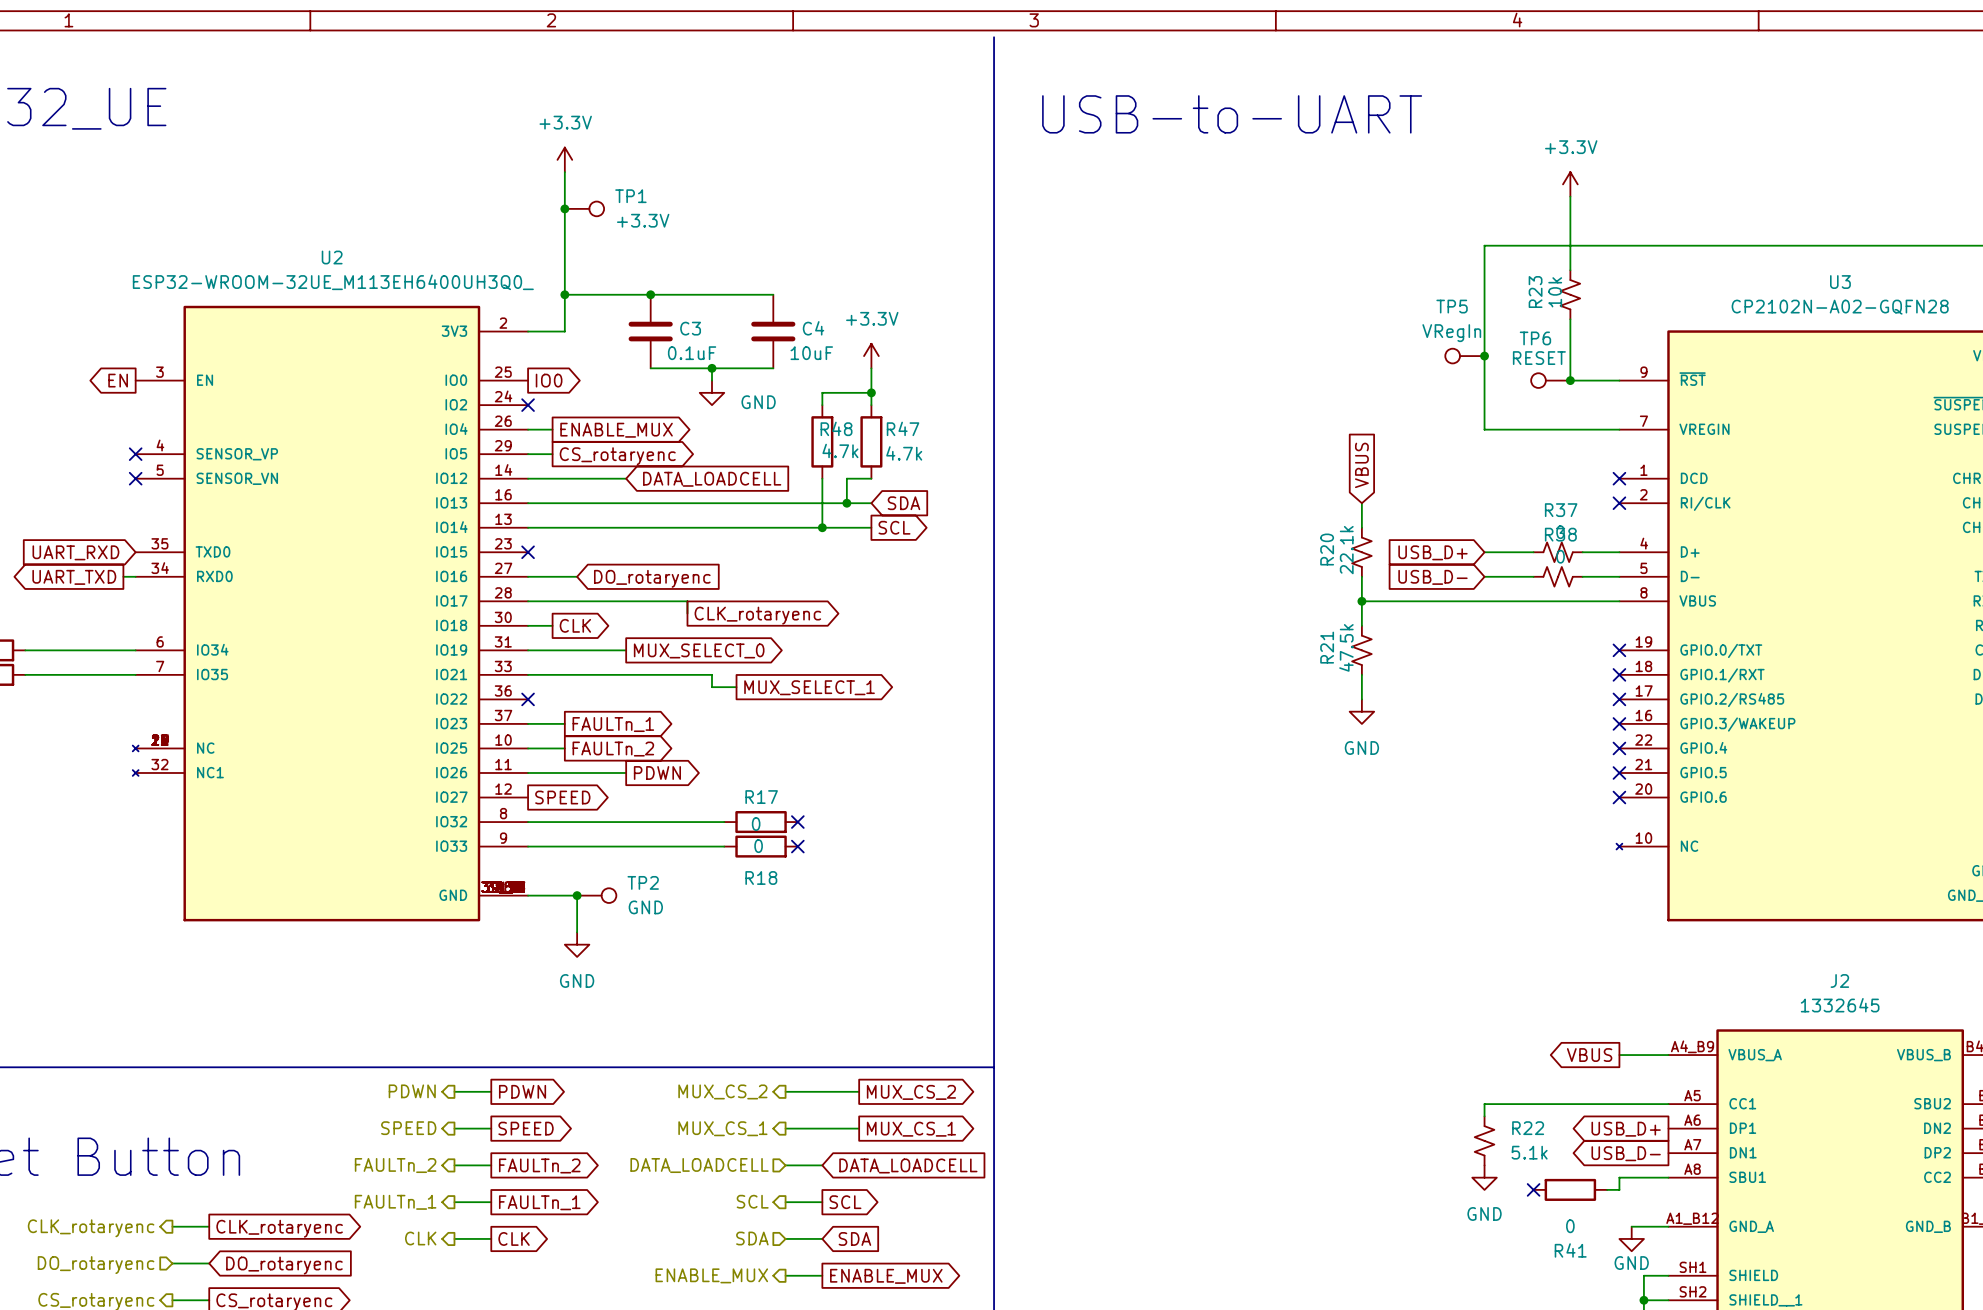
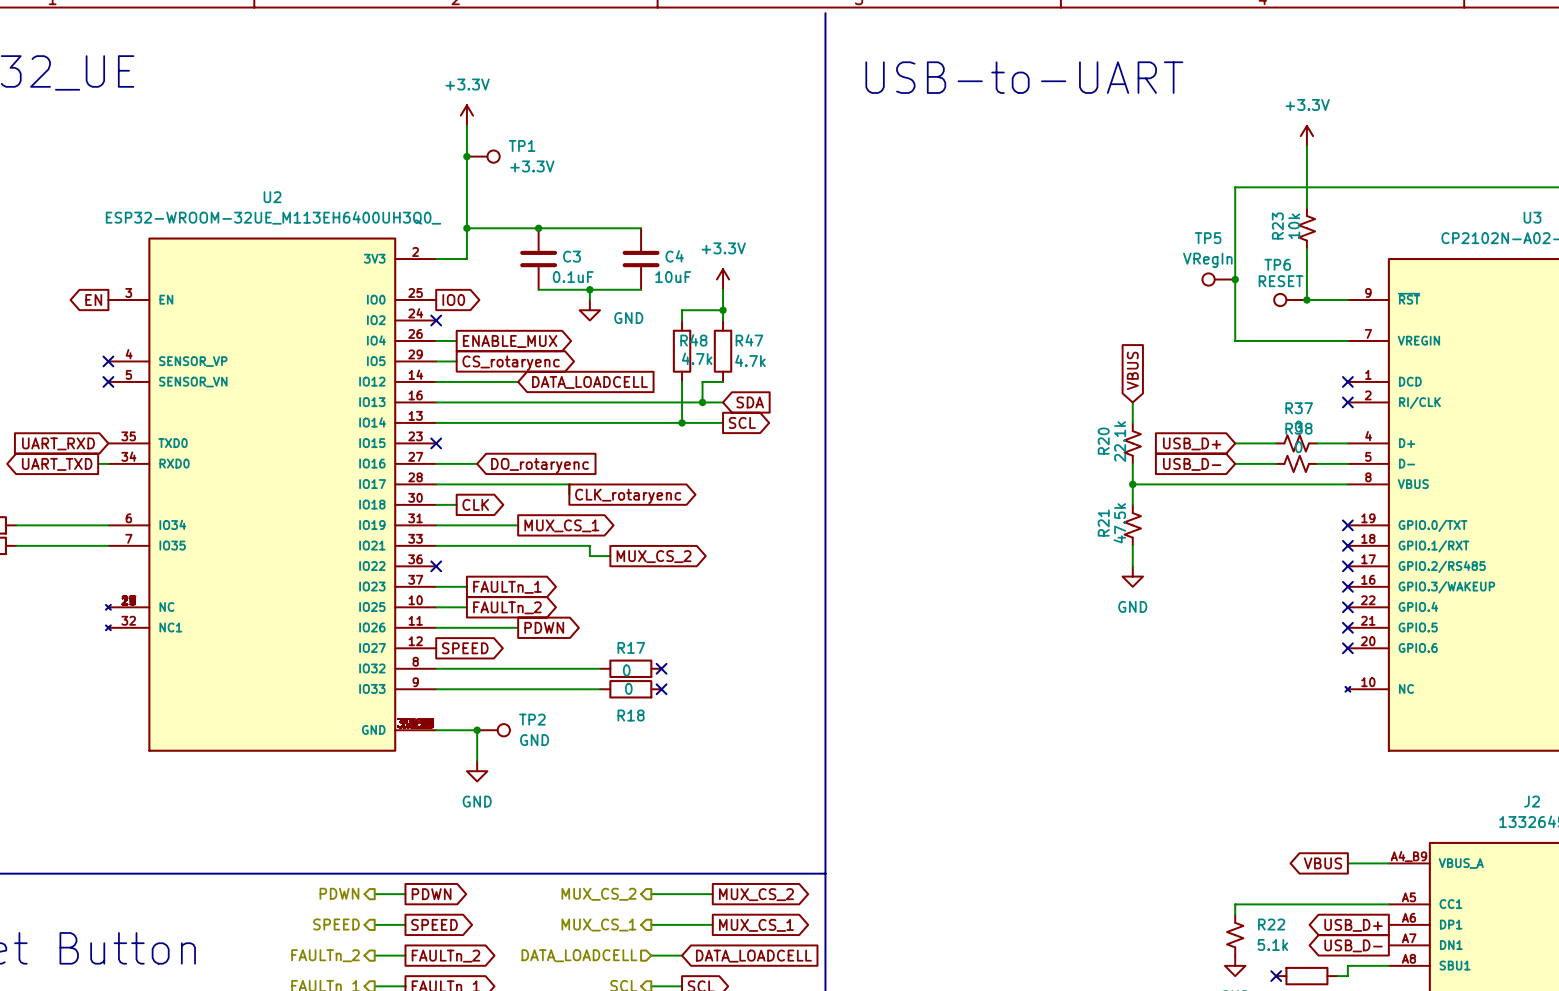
global label: MUX_SELECT_0 (699, 650) -> MUX_CS_1 (561, 525)
global label: MUX_SELECT_1 (809, 687) -> MUX_CS_2 (654, 556)

